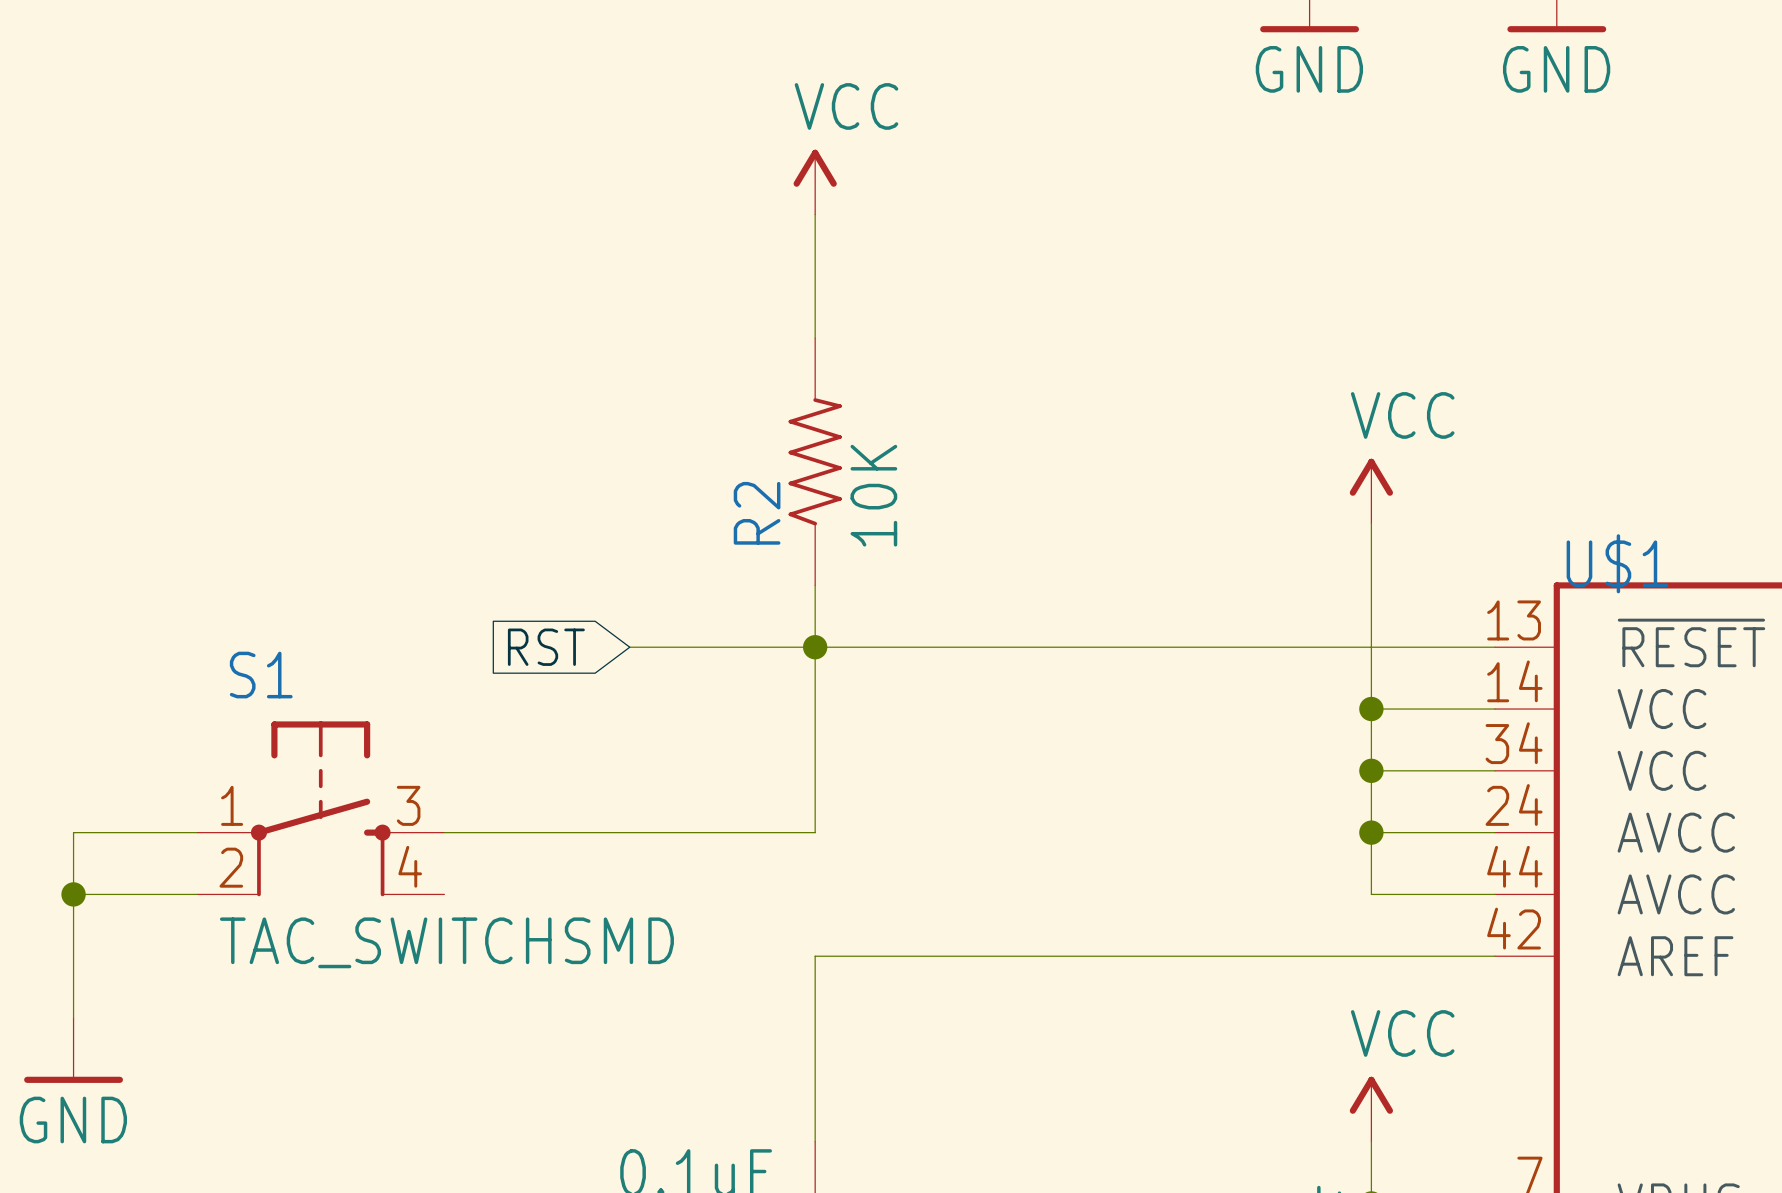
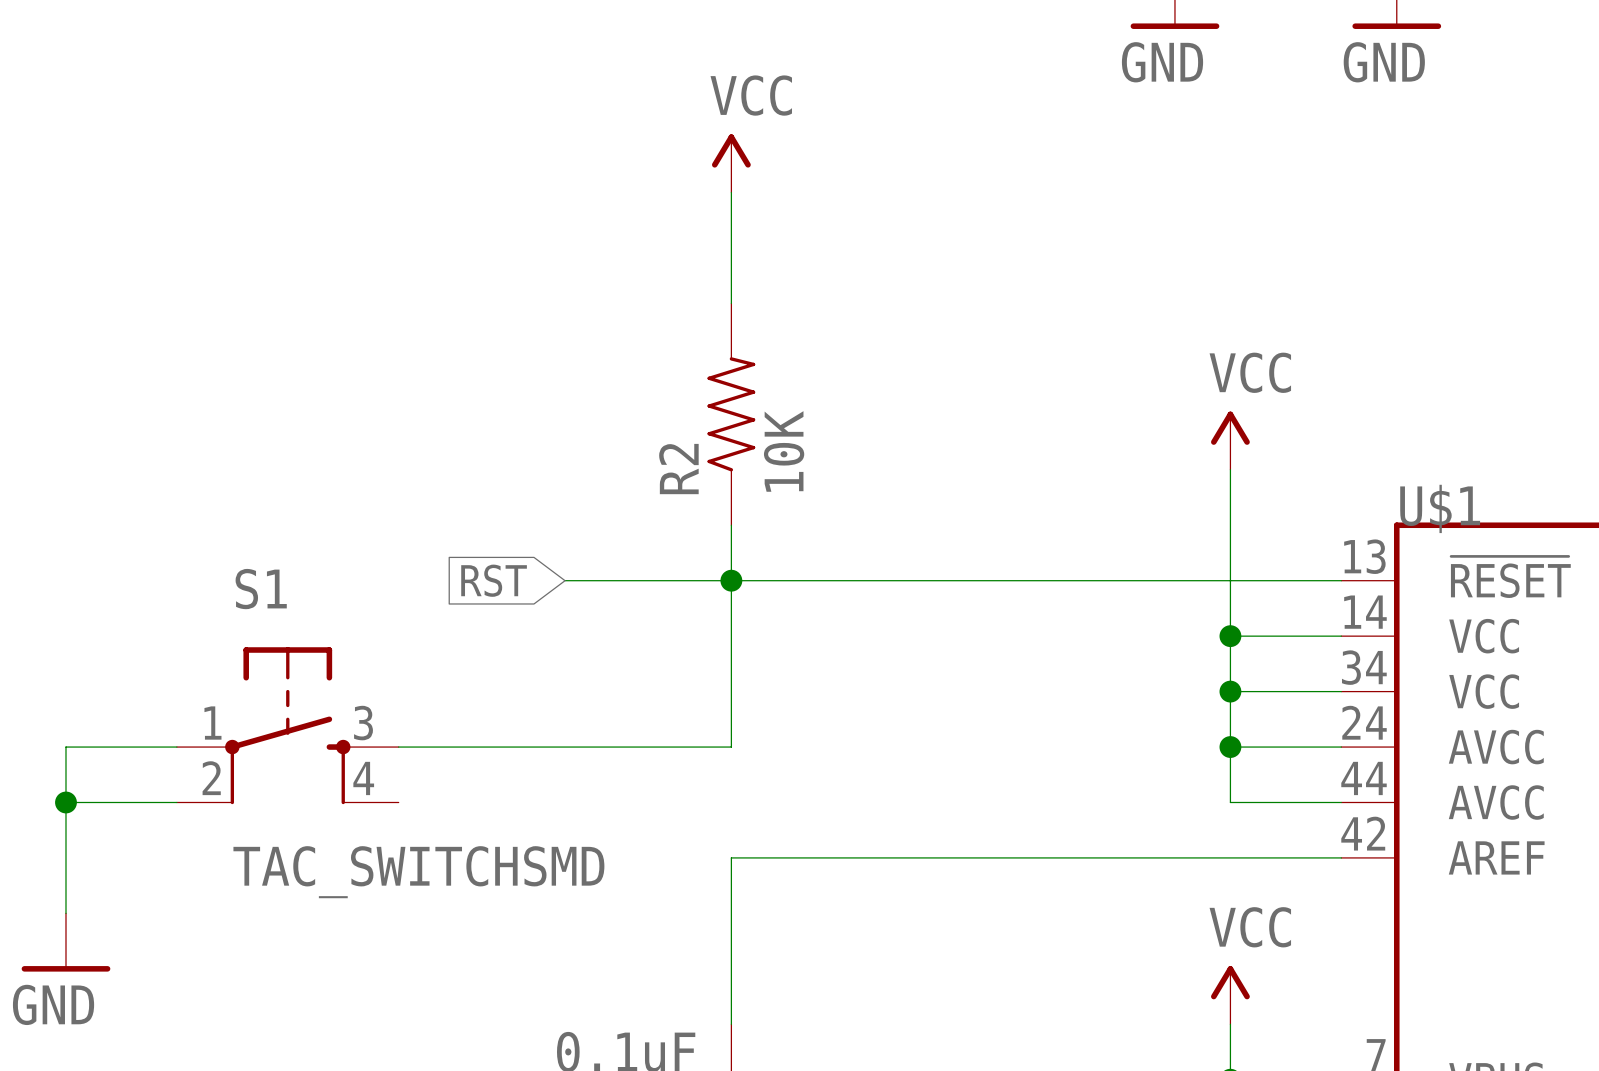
S1 name position: S1 (261, 675) -> S1 (261, 589)
S1 value position: TAC_SWITCHSMD (446, 942) -> TAC_SWITCHSMD (418, 872)

